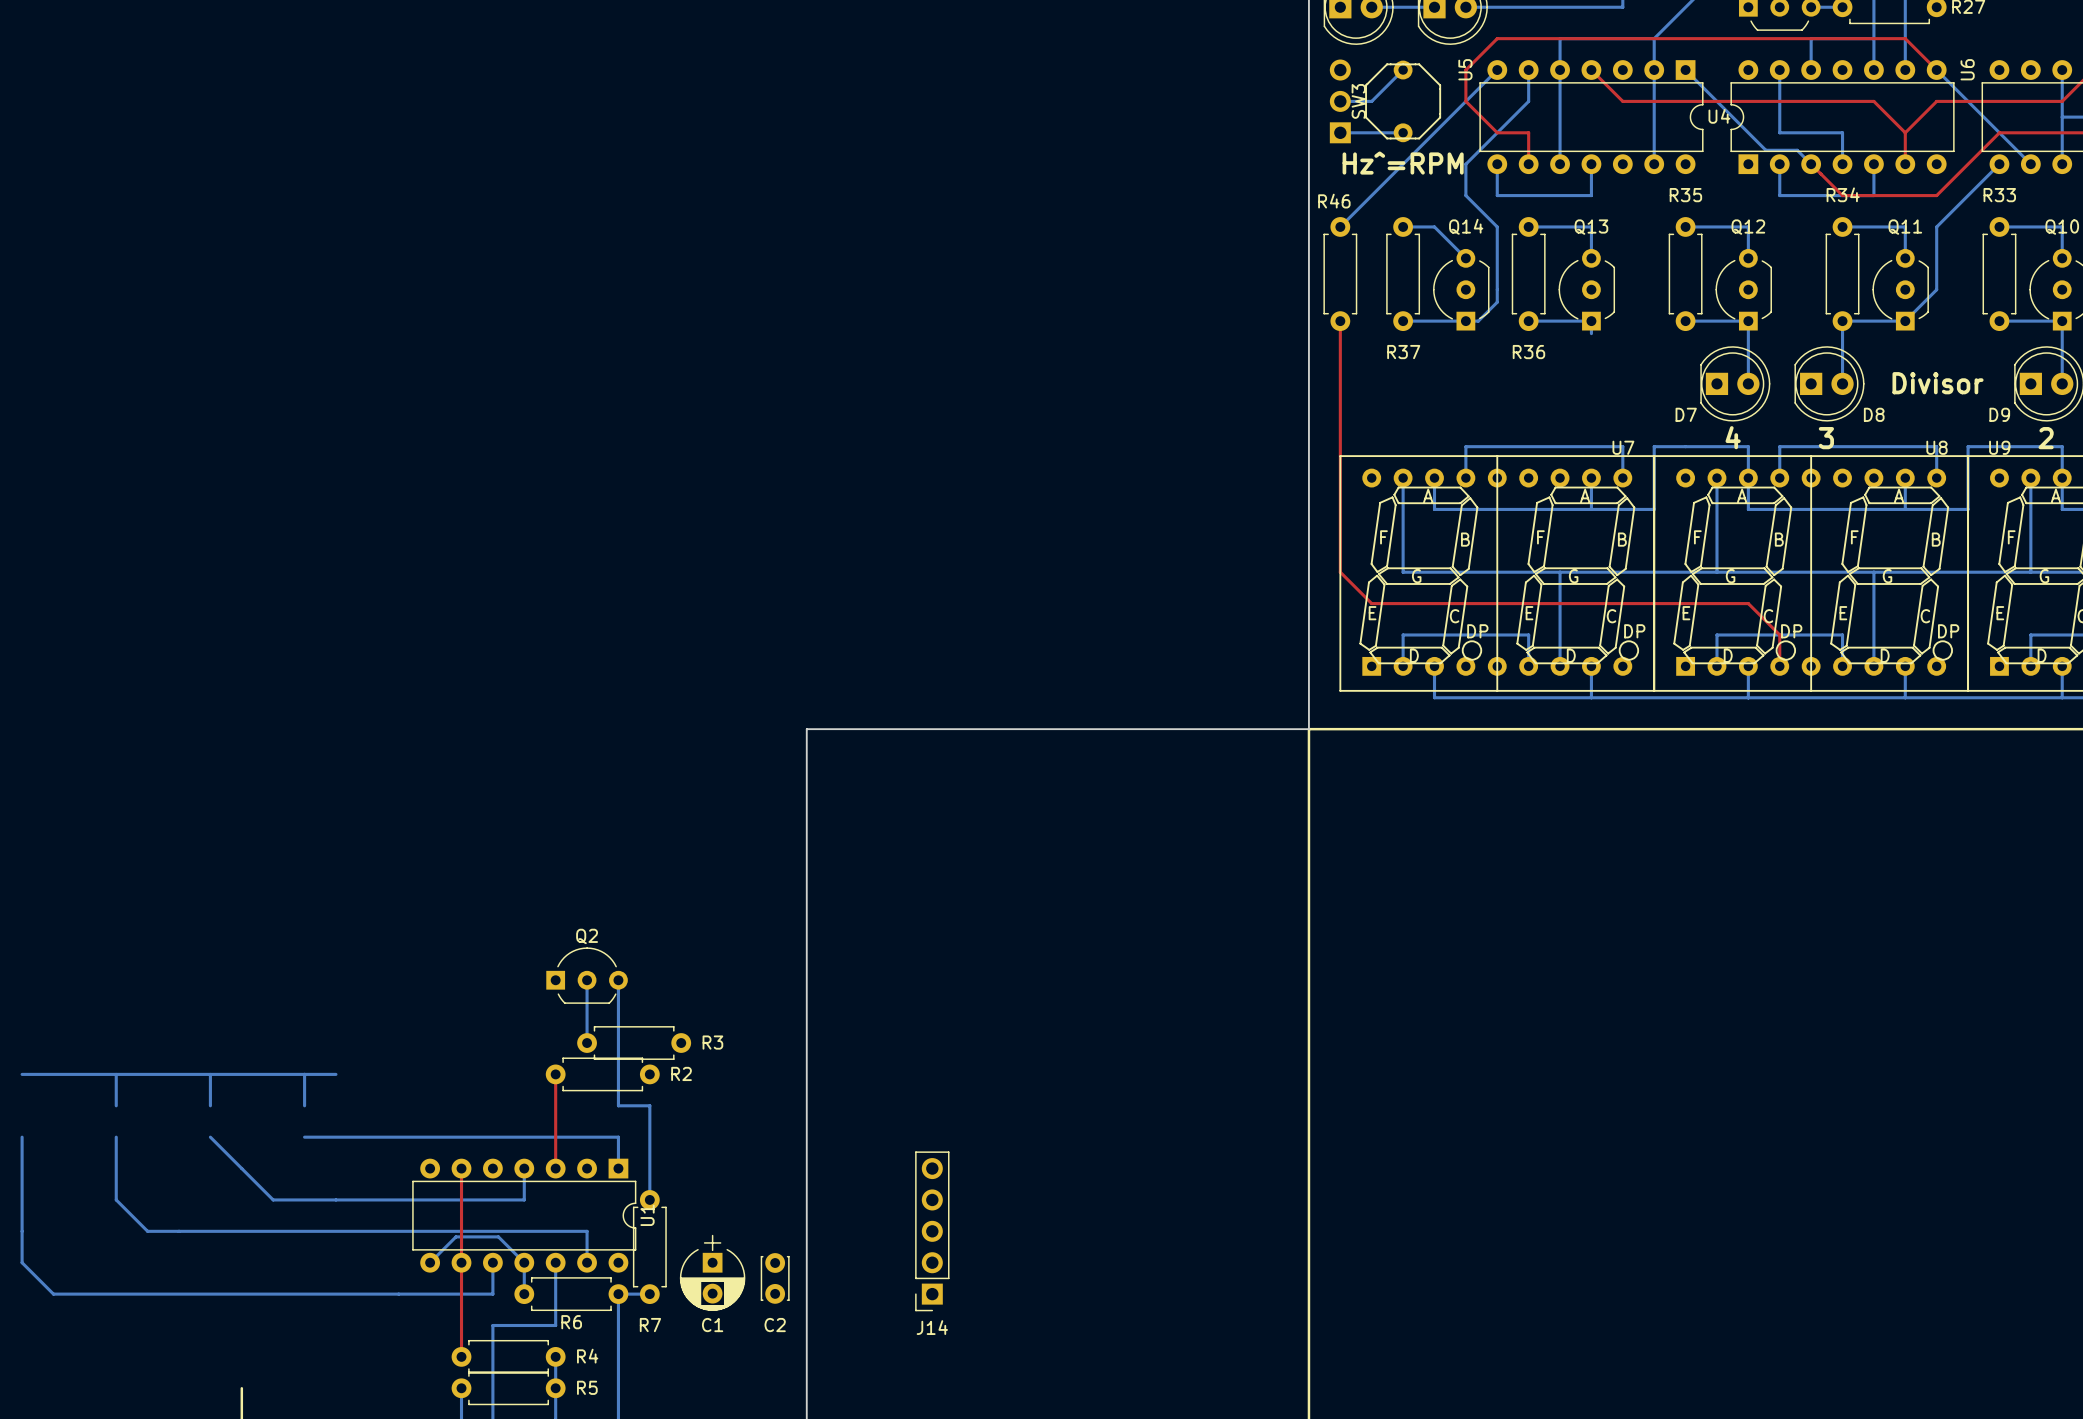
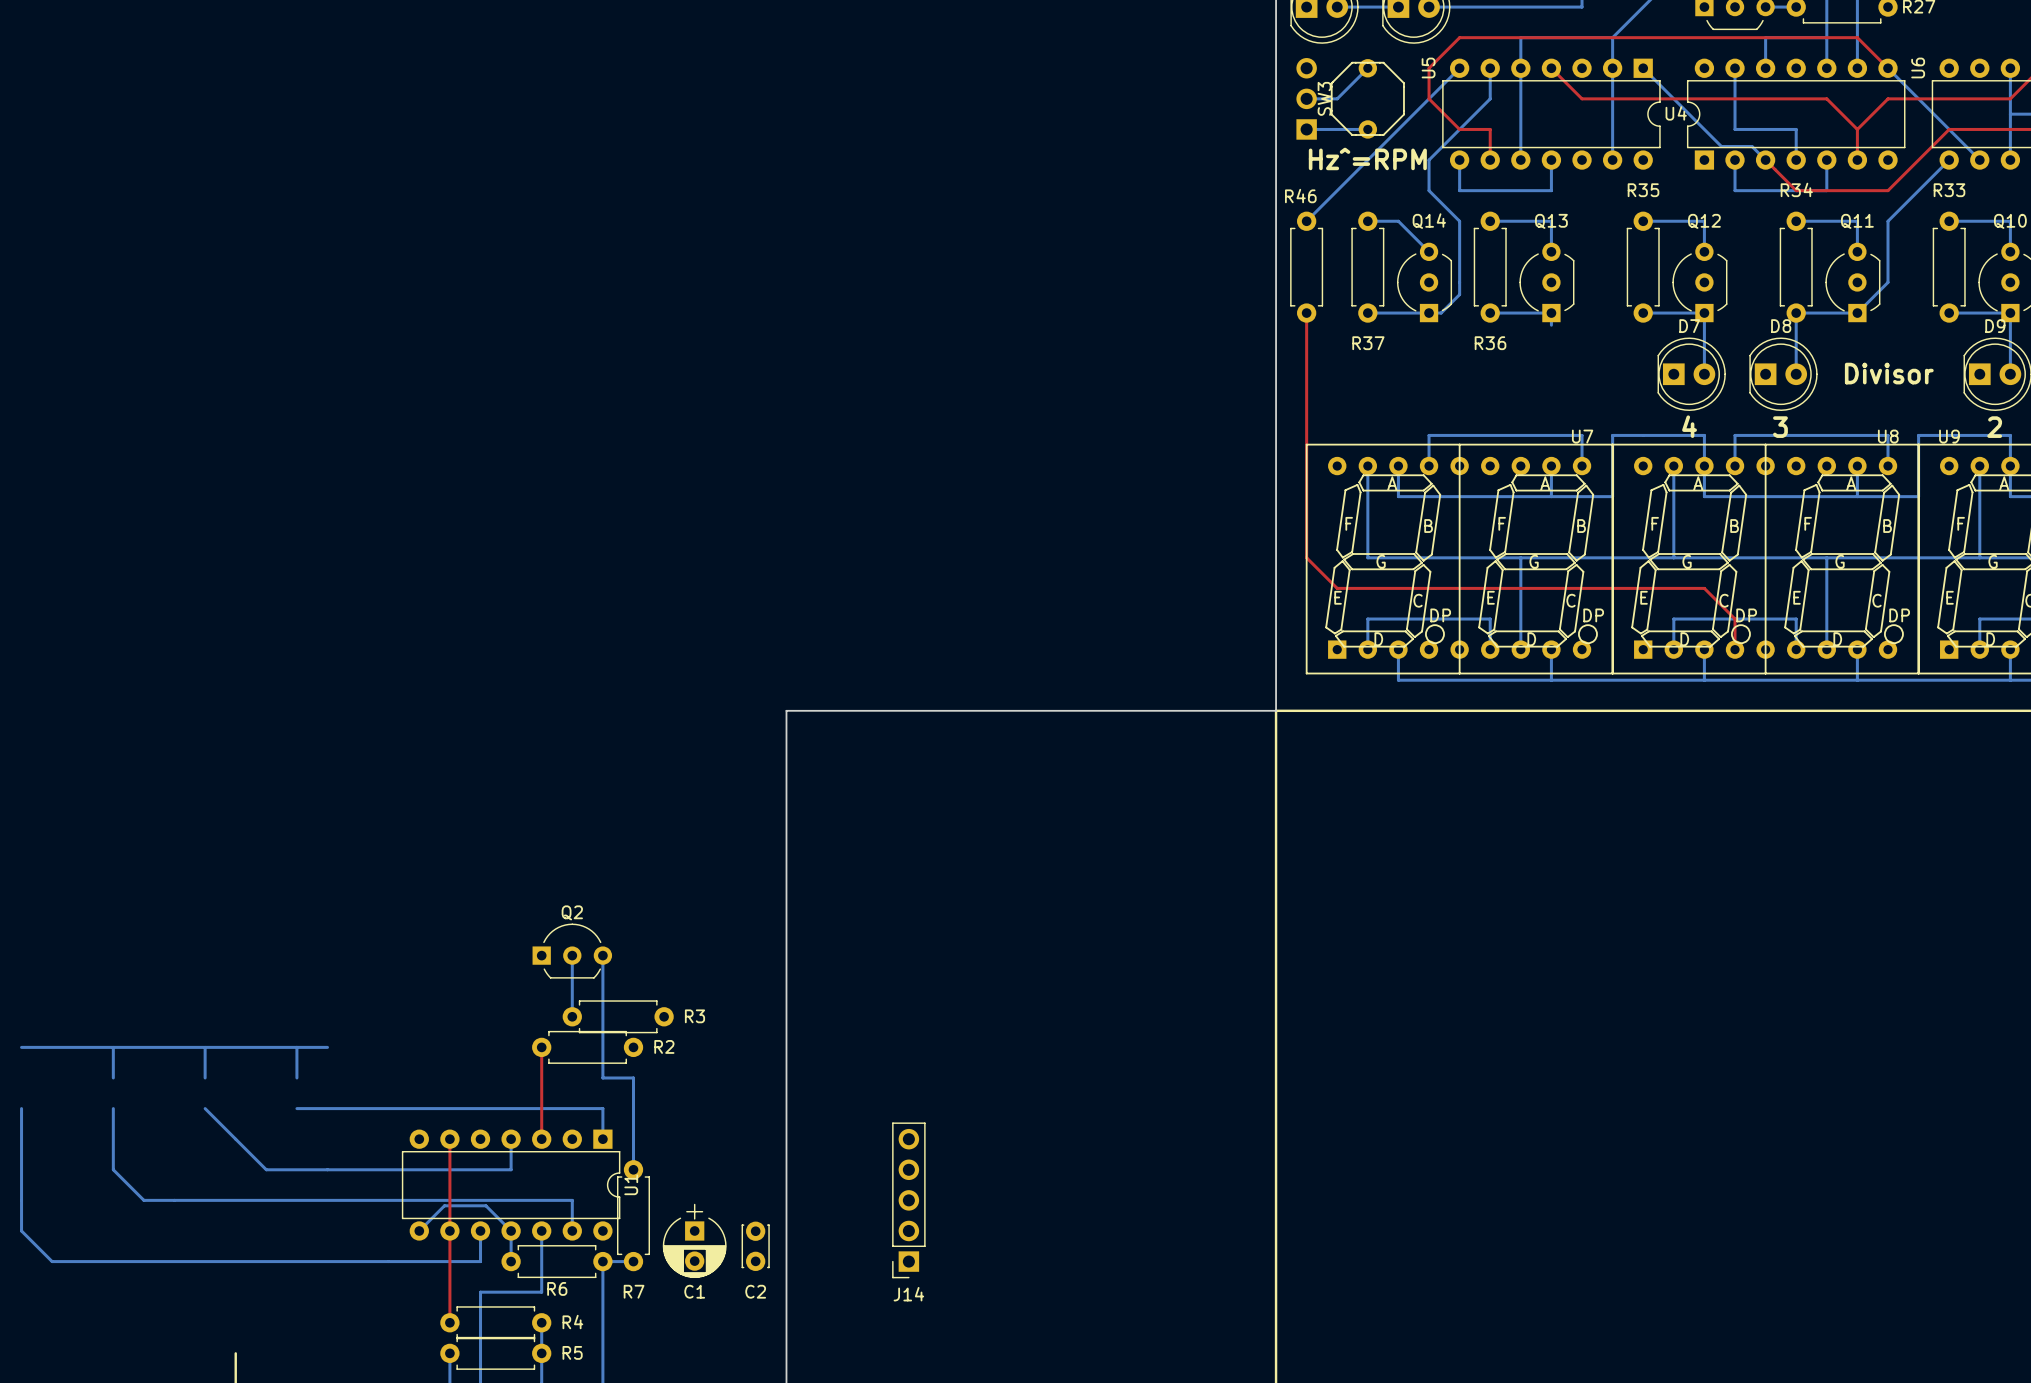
D7 name position: D7 (1686, 414) -> D7 (1689, 326)
D8 name position: D8 (1874, 414) -> D8 (1781, 326)
D9 name position: D9 (1999, 414) -> D9 (1995, 326)

